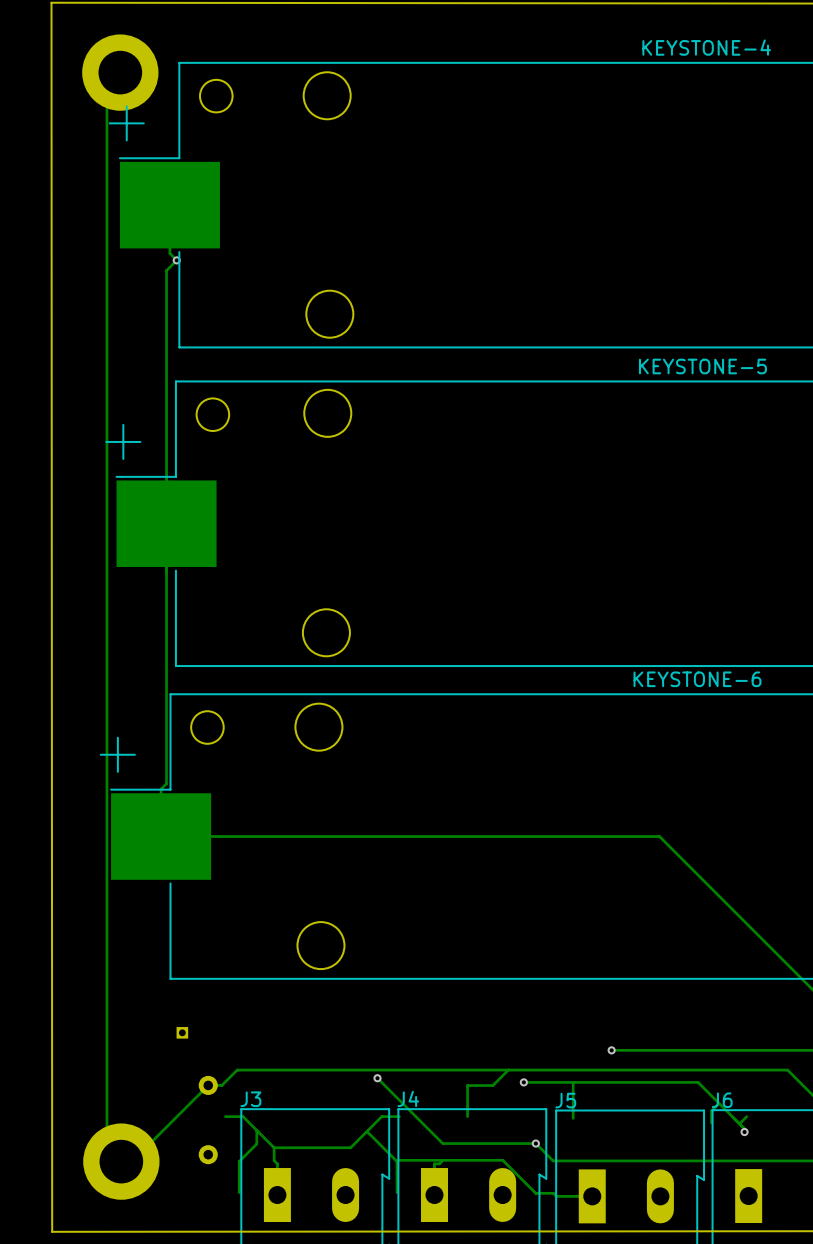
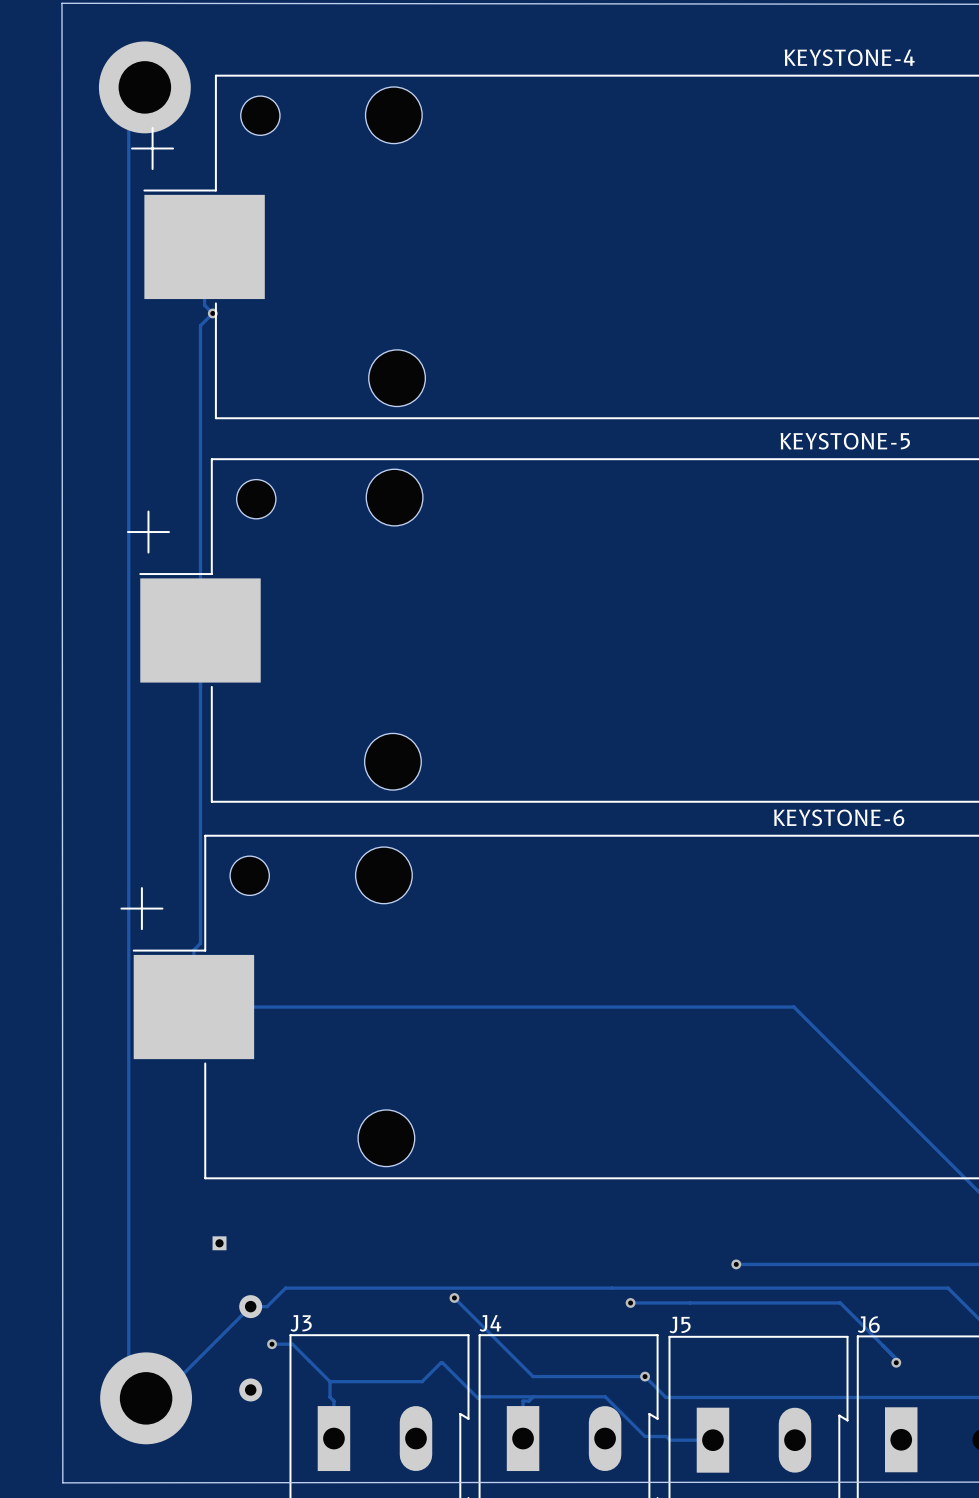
track: (508, 1070) (492, 1085) (467, 1085) (467, 1116) -> none
track: (573, 1082) (573, 1118) -> none
track: (719, 1103) (711, 1111) (711, 1123) -> none
via: none -> (272, 1344)
track: (399, 1116) (381, 1116) (366, 1132) -> none
track: (746, 1116) (739, 1123) -> none
track: (256, 1130) (256, 1143) (239, 1161) (239, 1192) -> none
track: (397, 1161) (397, 1192) -> none

